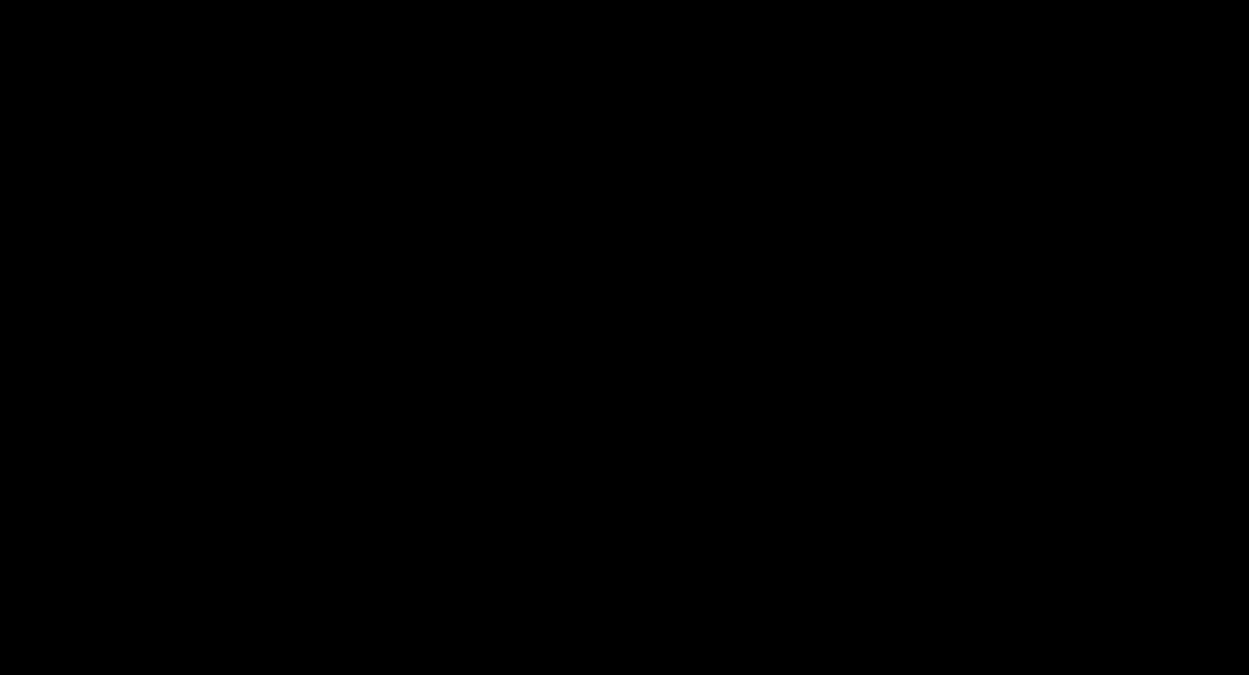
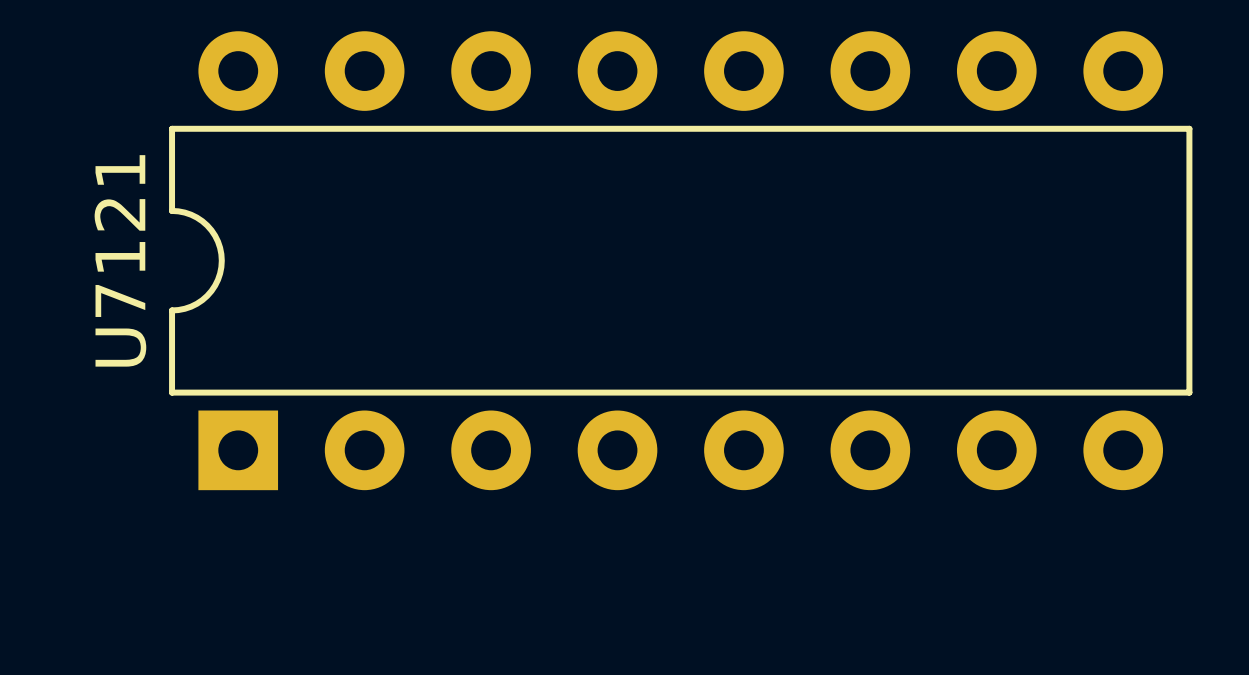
U7121: none -> (680, 260)

